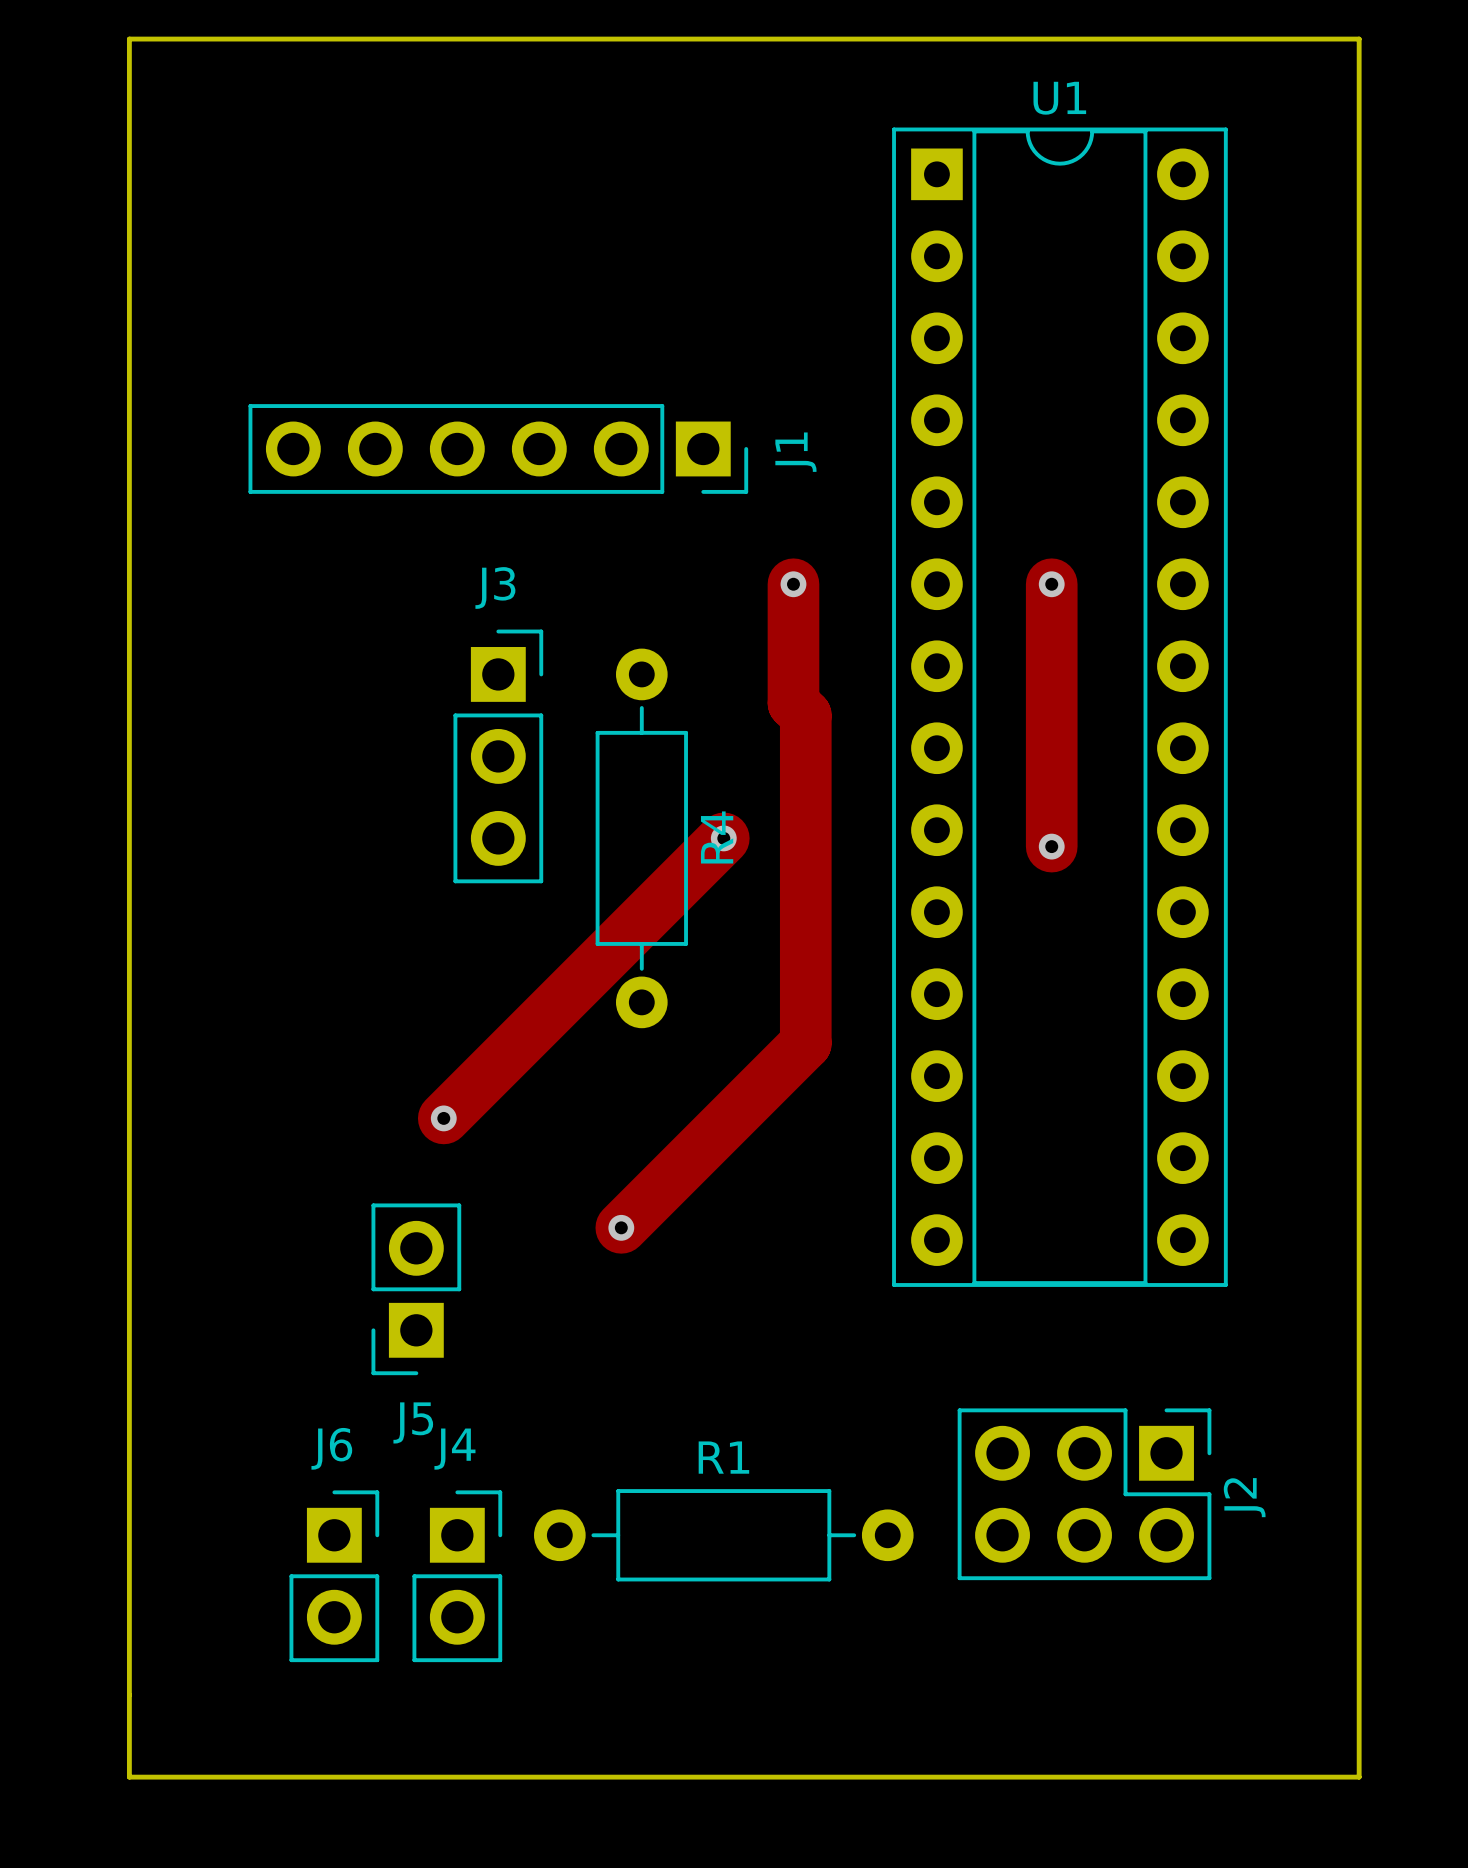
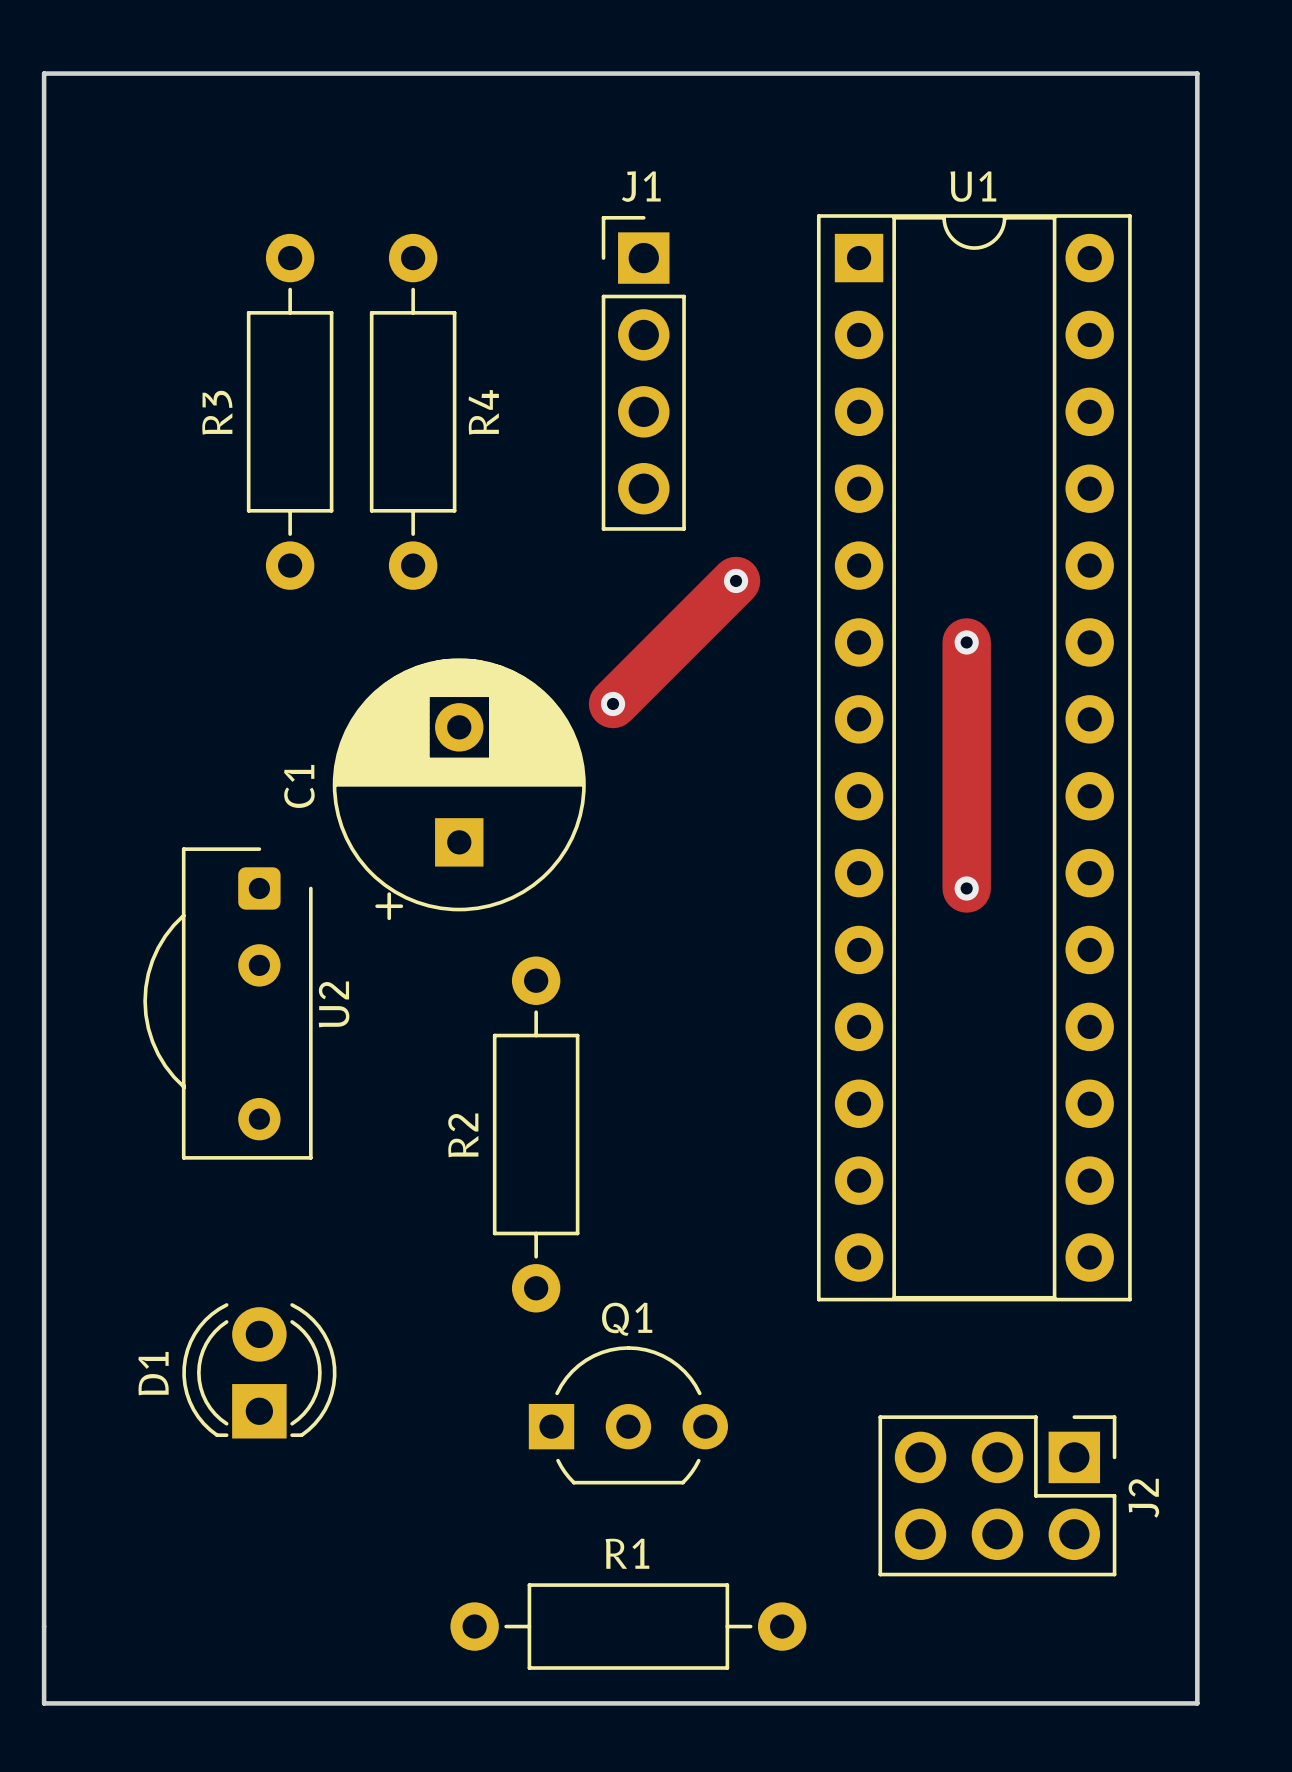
R3: none -> (290, 411)
J1 footprint: [248, 404, 749, 494] -> [601, 216, 686, 531]
J1 name position: J1 (795, 452) -> J1 (641, 186)
track: none -> (736, 580) (613, 703)
via: none -> (736, 580)
track: (793, 584) (793, 703) (805, 715) (805, 1043) (621, 1227) -> none
via: (793, 584) -> none
track: (1051, 584) (1051, 846) -> (966, 642) (966, 888)
via position: (1051, 584) -> (966, 642)
U1 position: (1059, 707) -> (974, 757)
via: none -> (613, 703)
J3: (498, 756) -> none
C1: none -> (459, 789)
R4 position: (641, 838) -> (413, 411)
track: (723, 838) (443, 1118) -> none
via: (723, 838) -> none
via position: (1051, 846) -> (966, 888)
U2: none -> (227, 1003)
via: (443, 1118) -> none
R2: none -> (536, 1134)
via: (621, 1227) -> none
J5: (416, 1289) -> none
D1: none -> (259, 1370)
Q1: none -> (628, 1415)
J2 position: (1084, 1494) -> (997, 1495)
R1 position: (723, 1535) -> (628, 1626)
J6: (334, 1576) -> none
J4: (457, 1576) -> none

